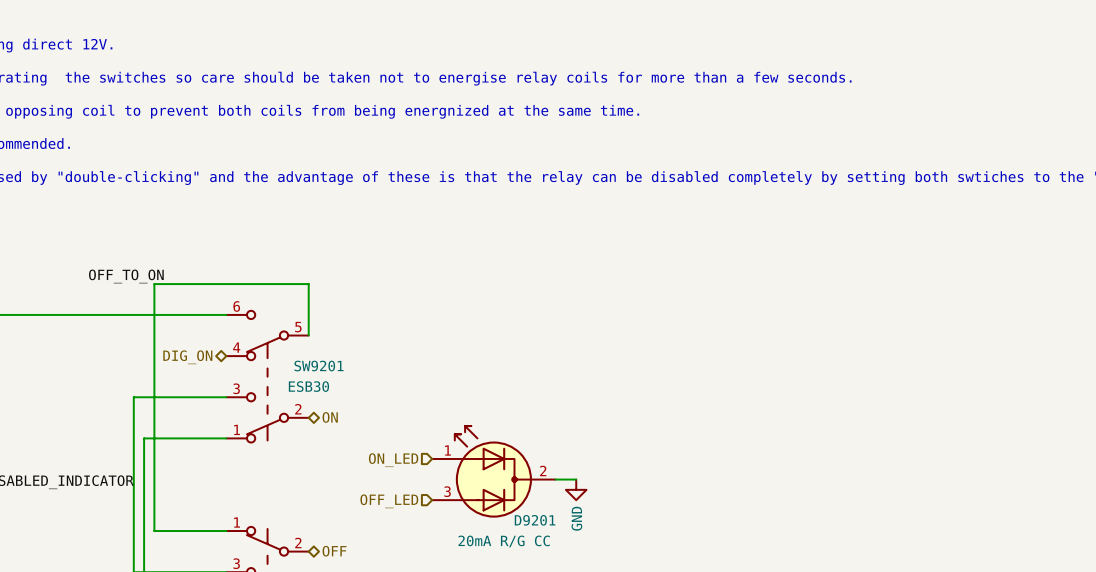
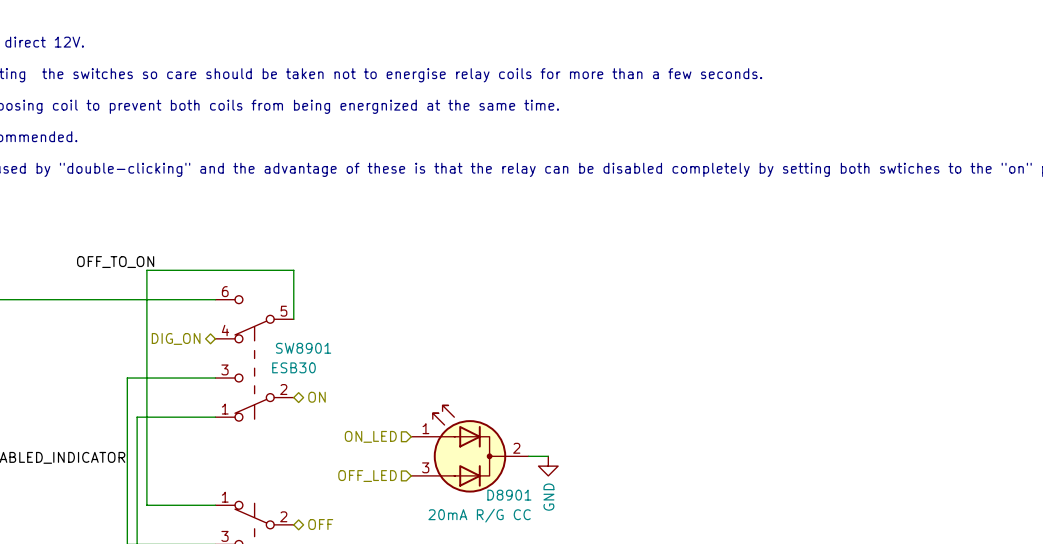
SW9201 name: SW9201 (319, 366) -> SW8901 (303, 348)
D9201 name: D9201 (535, 520) -> D8901 (509, 495)

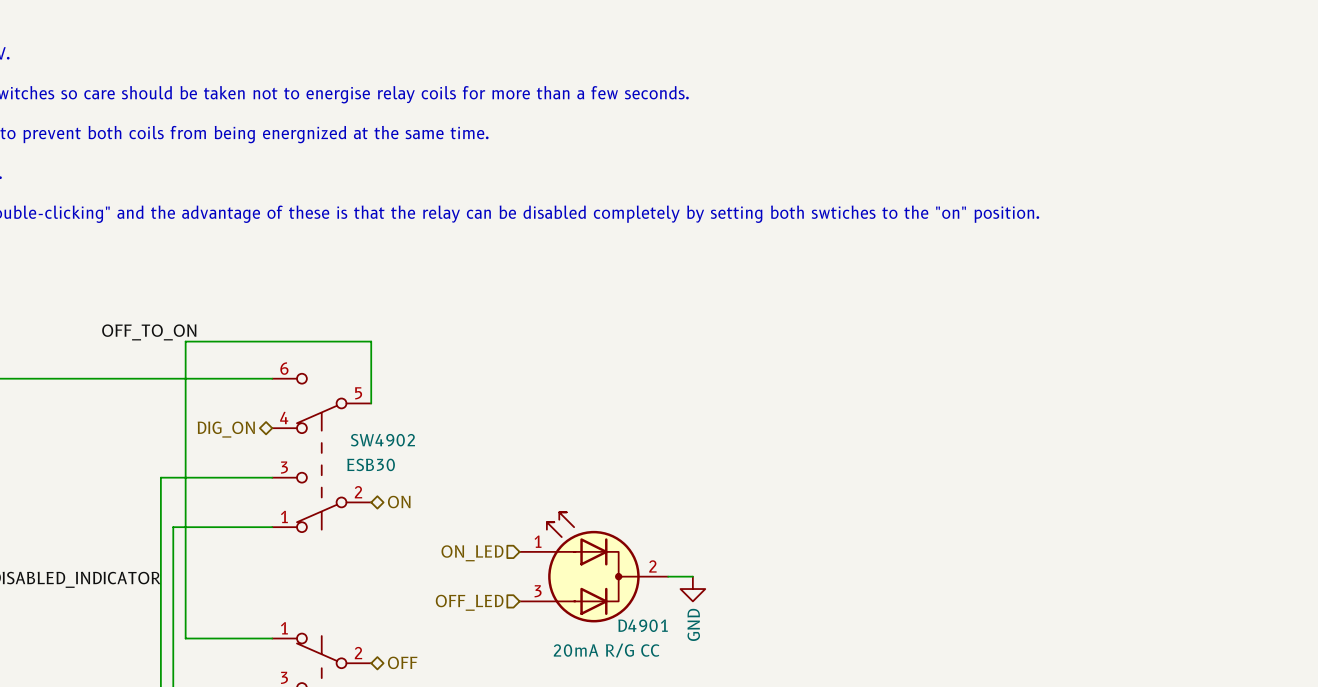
SW8901 name: SW8901 (303, 348) -> SW4902 (382, 440)
D8901 name: D8901 (509, 495) -> D4901 (643, 625)

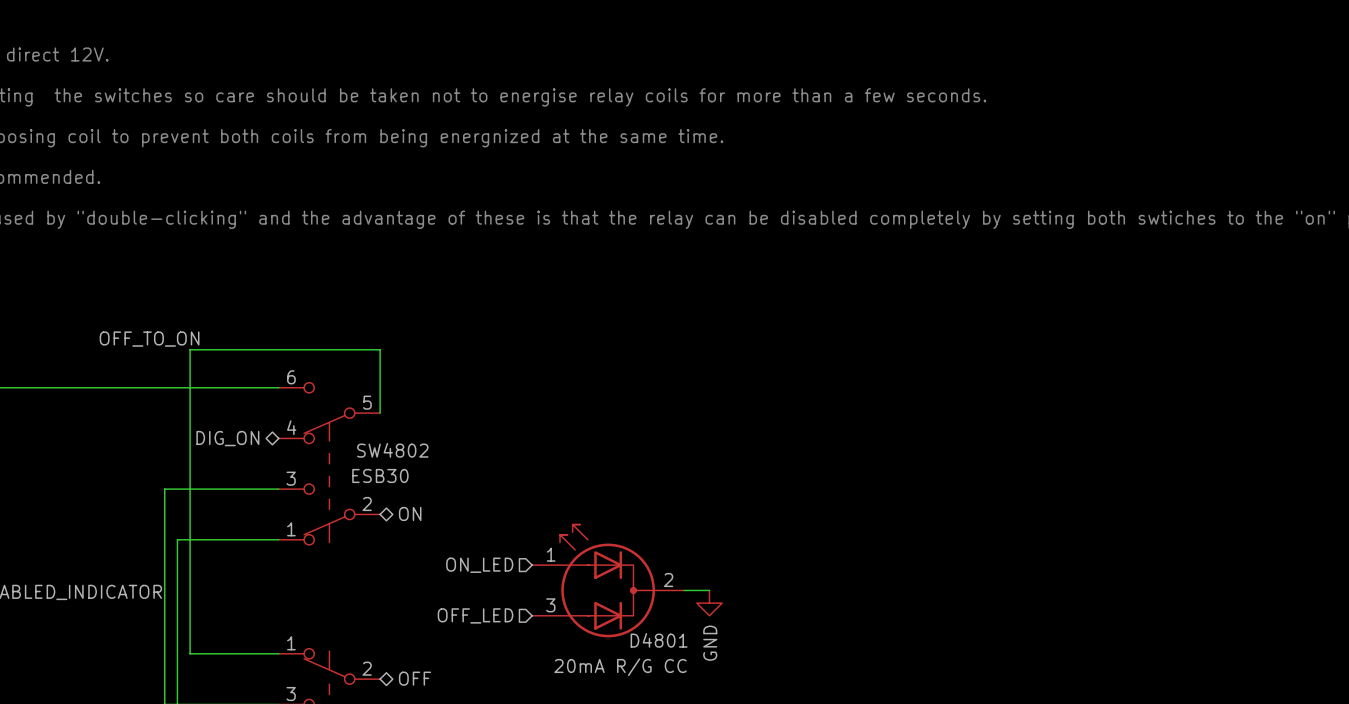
SW4902 name: SW4902 (382, 440) -> SW4802 (392, 450)
D4901 name: D4901 (643, 625) -> D4801 (659, 640)

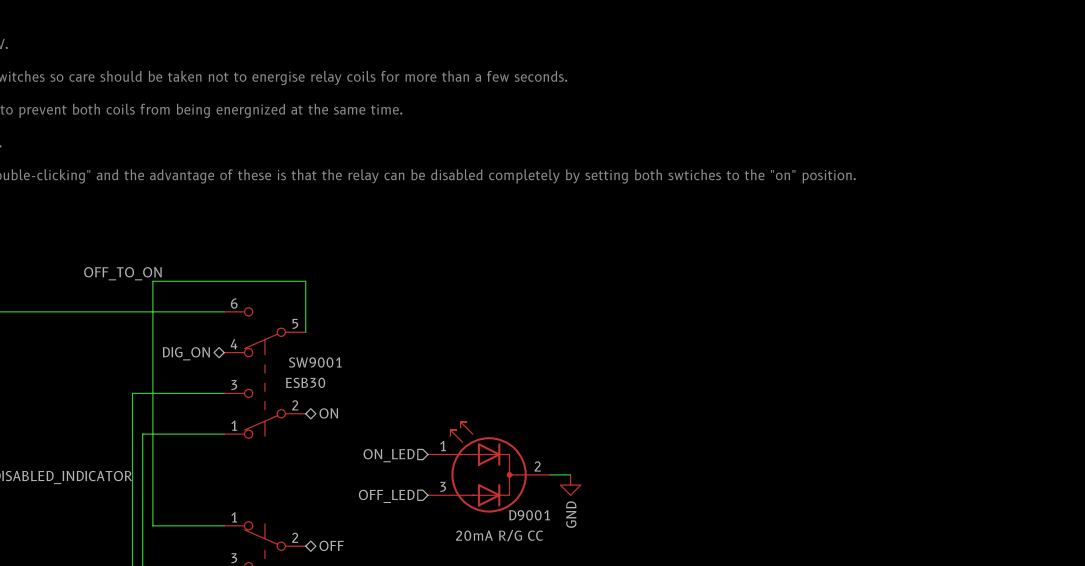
SW4802 name: SW4802 (392, 450) -> SW9001 (315, 362)
D4801 name: D4801 (659, 640) -> D9001 (529, 515)

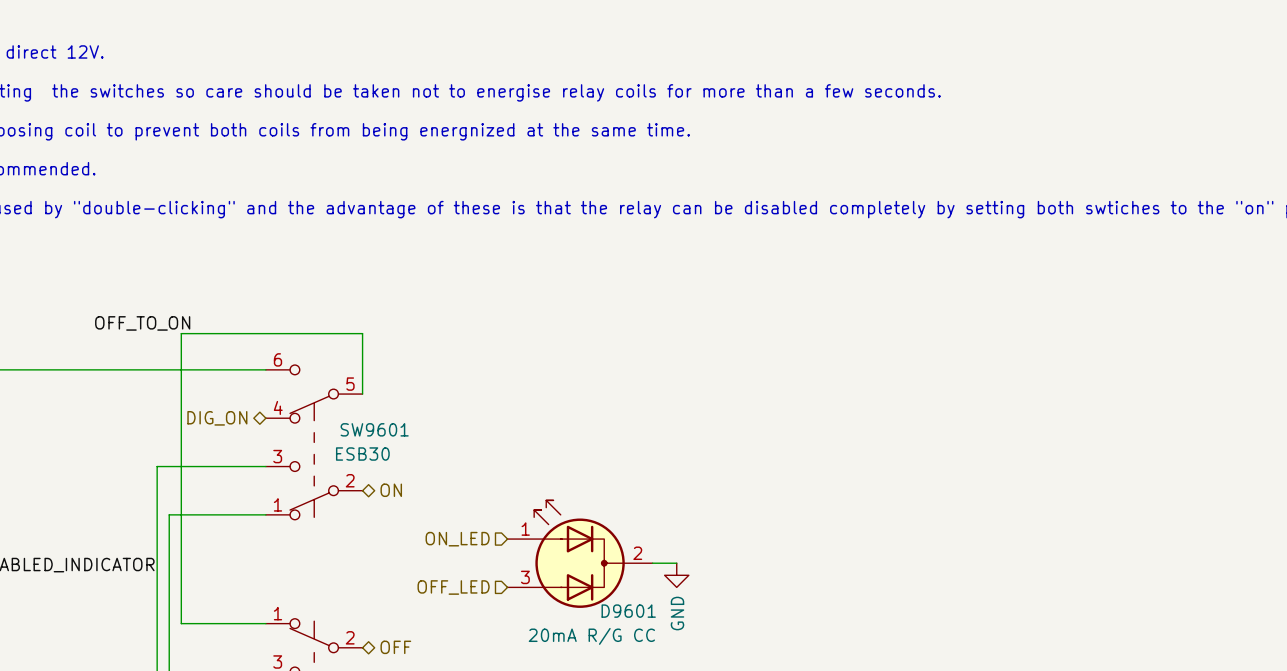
SW9001 name: SW9001 (315, 362) -> SW9601 (374, 429)
D9001 name: D9001 (529, 515) -> D9601 (628, 611)

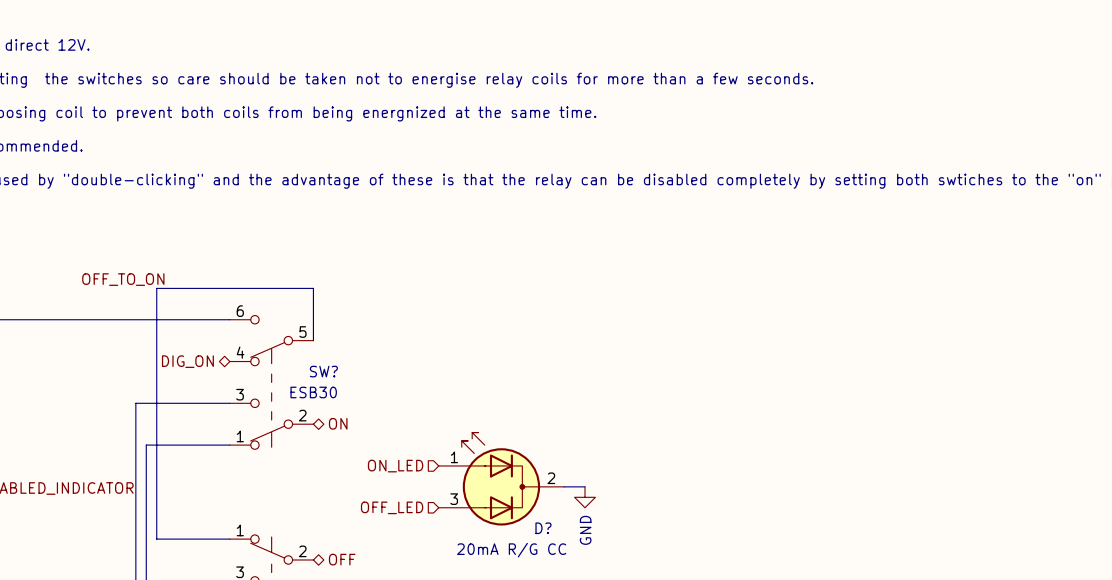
SW9601 name: SW9601 (374, 429) -> SW? (323, 371)
D9601 name: D9601 (628, 611) -> D? (543, 528)

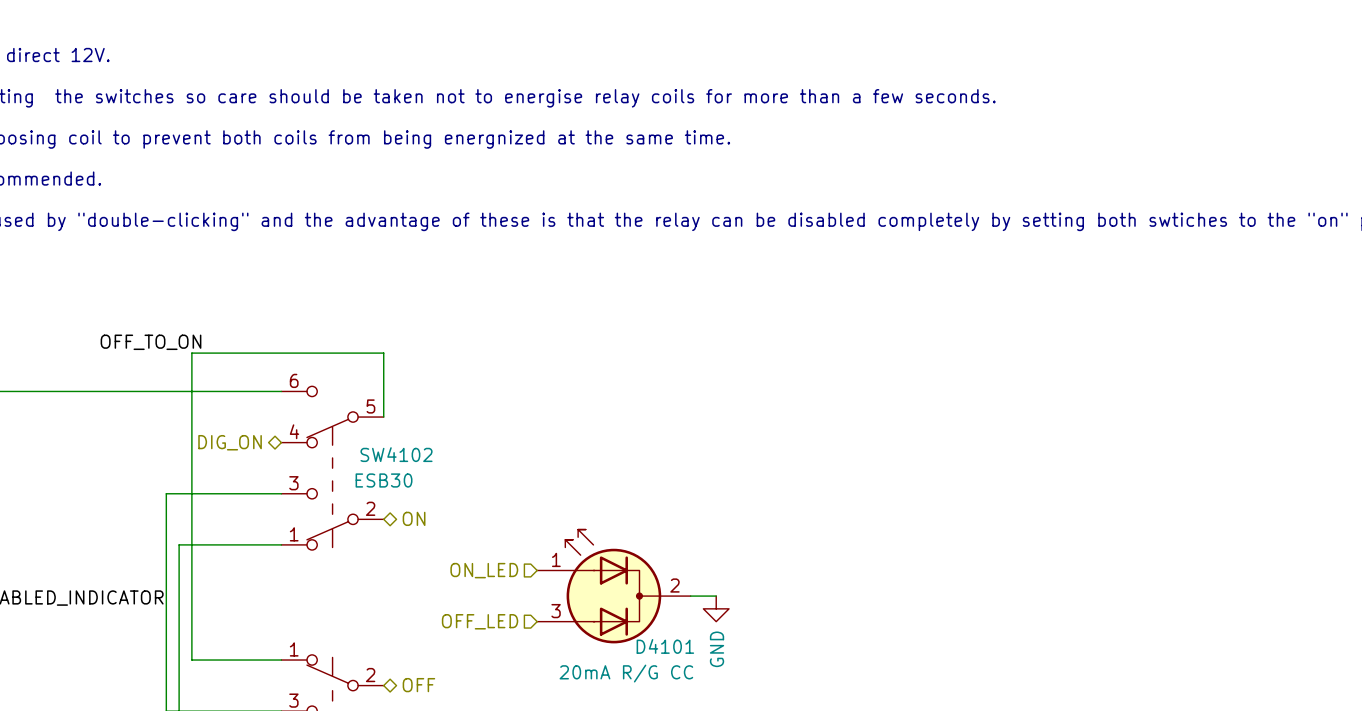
SW? name: SW? (323, 371) -> SW4102 (396, 454)
D? name: D? (543, 528) -> D4101 (665, 646)

